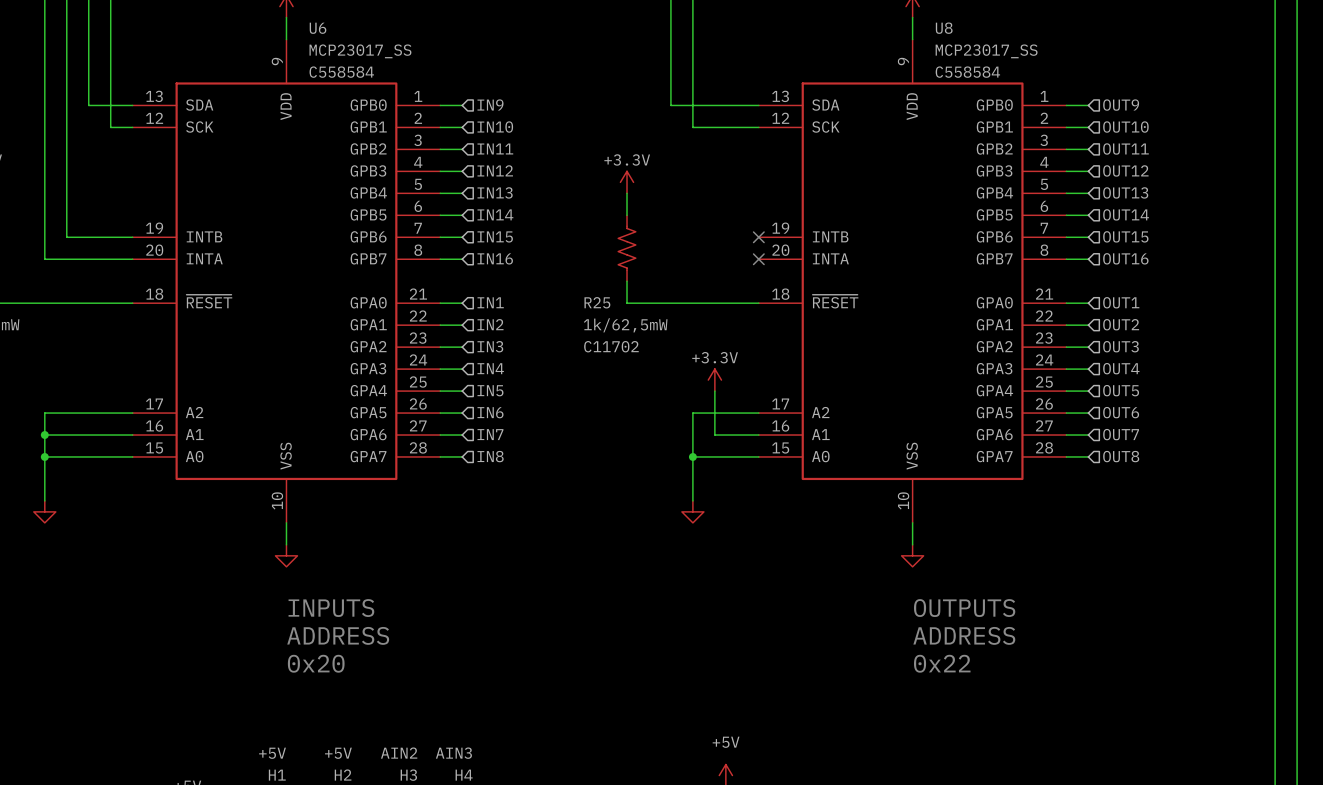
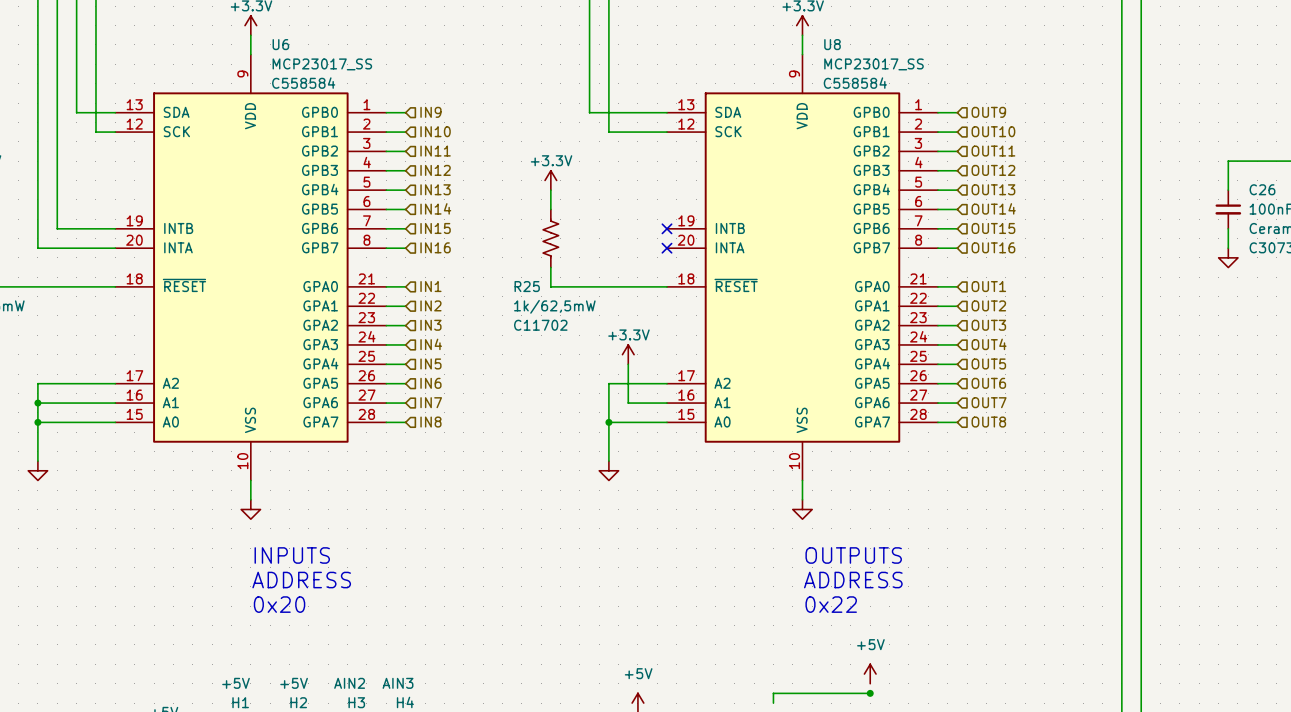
power symbol: none -> +5V (870, 674)
wire: none -> (870, 693) (773, 693) (773, 703)
junction: none -> (870, 693)

